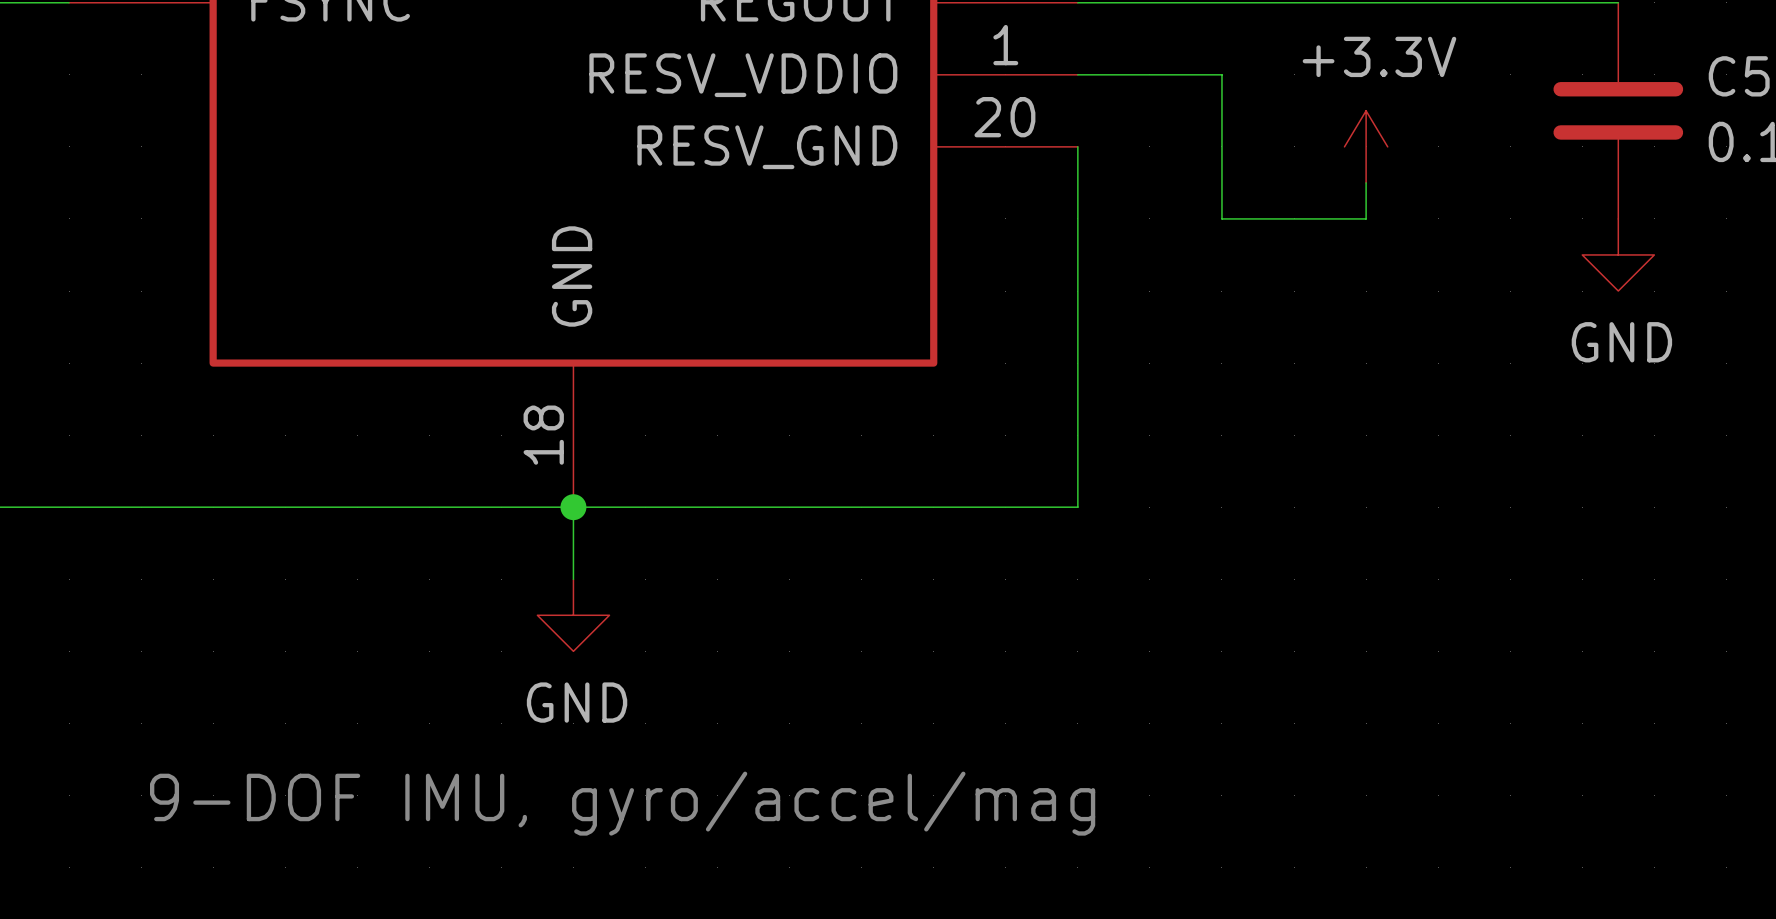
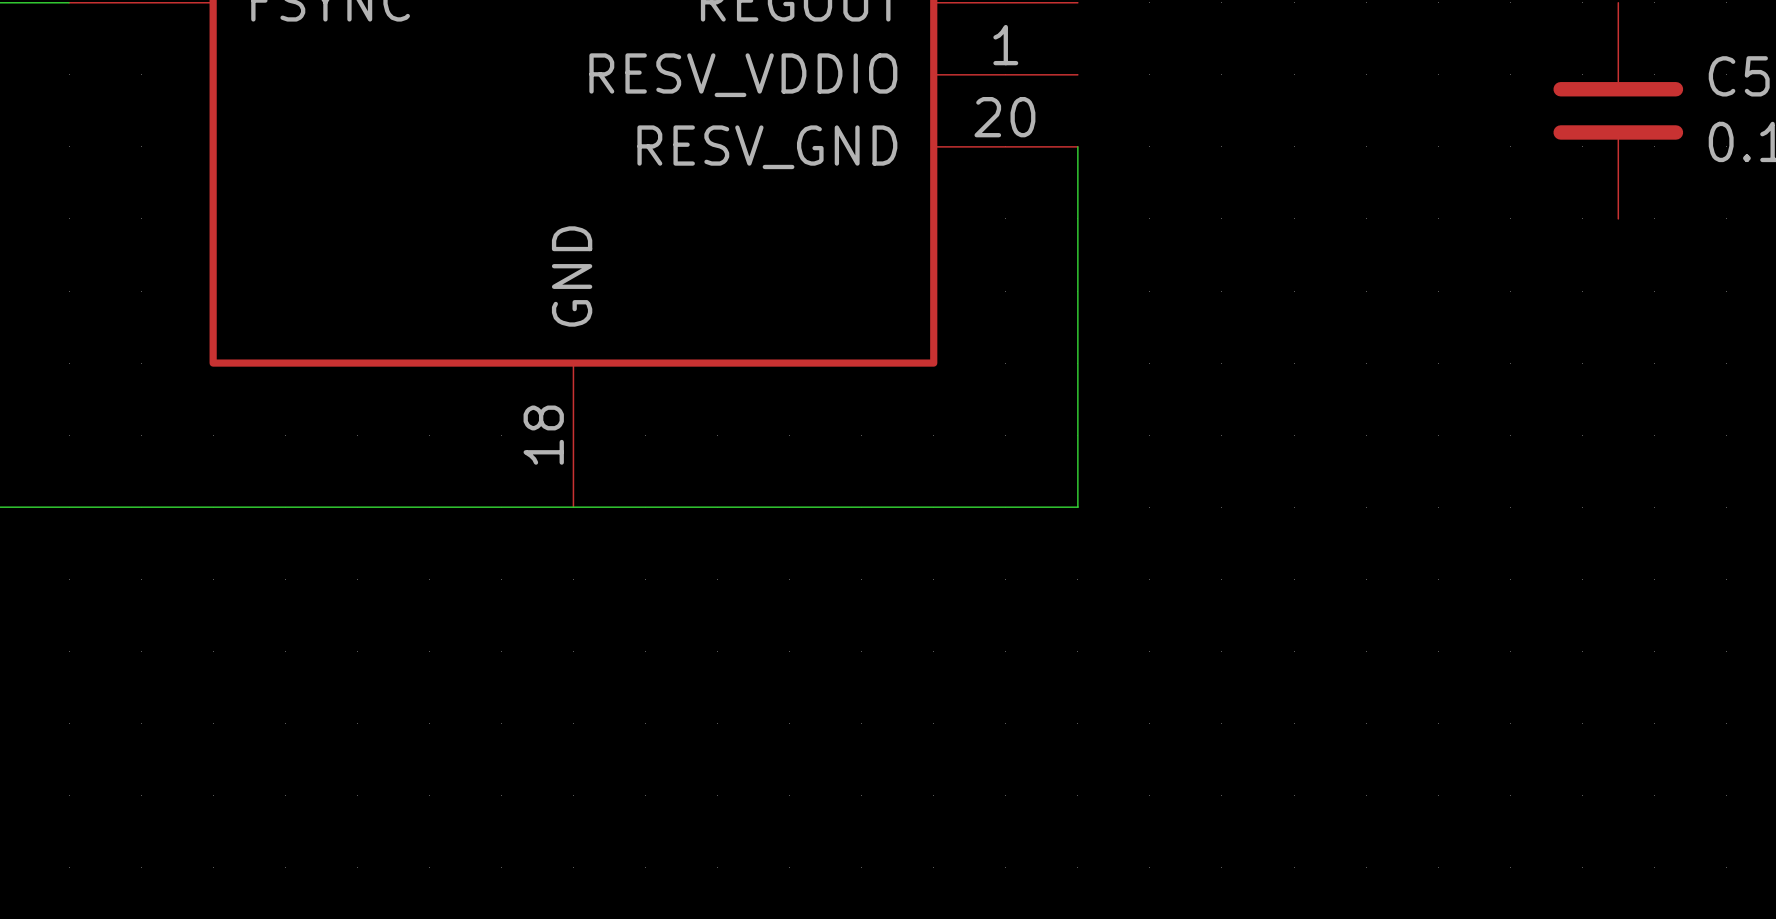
wire: (1077, 2) (1618, 2) -> none
wire: (1077, 74) (1221, 74) (1221, 218) (1366, 218) (1366, 182) -> none
power symbol: +3.3V (1366, 146) -> none
power symbol: GND (1618, 254) -> none
wire: (573, 507) (573, 579) -> none
junction: (573, 507) -> none
power symbol: GND (573, 615) -> none
text: 9-DOF IMU, gyro/accel/mag (622, 803) -> none

